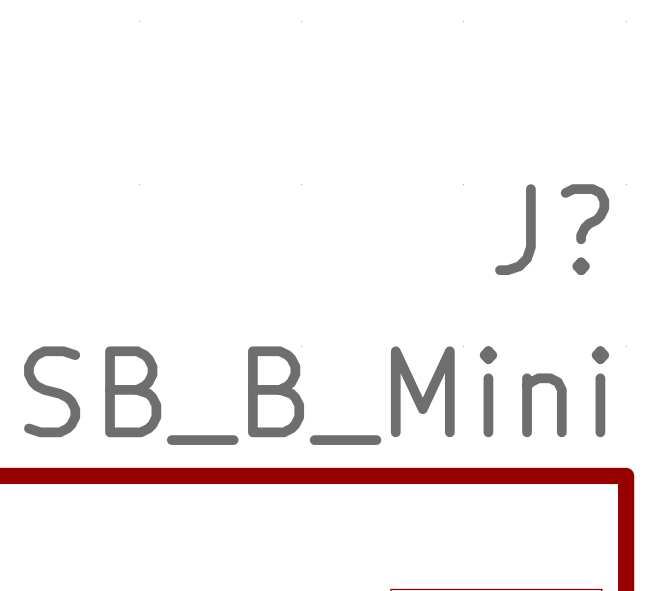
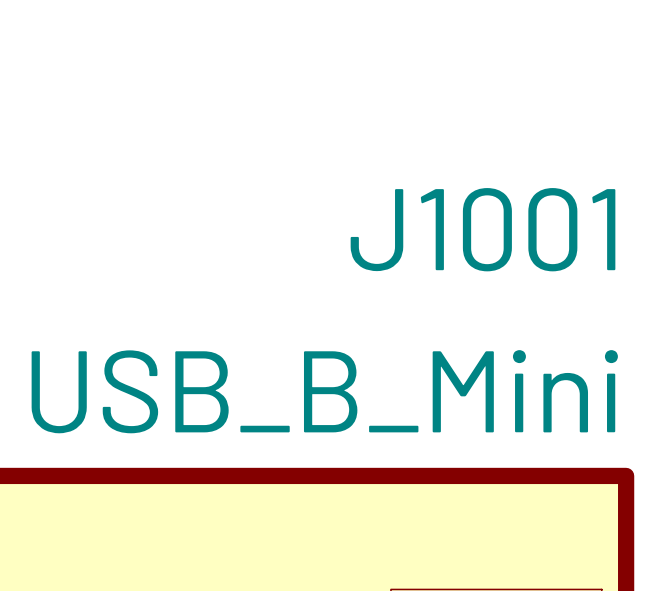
J? name: J? (552, 229) -> J1001 (483, 229)

